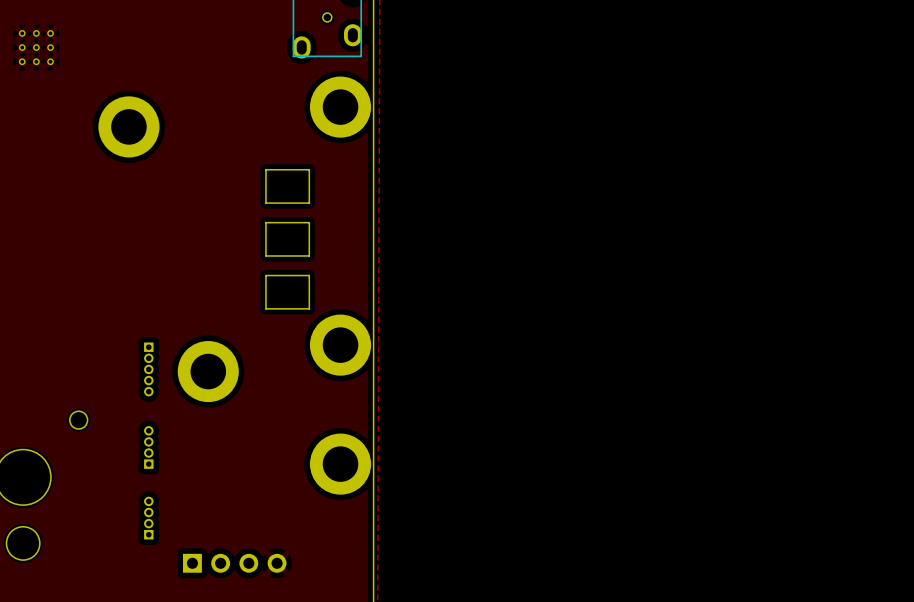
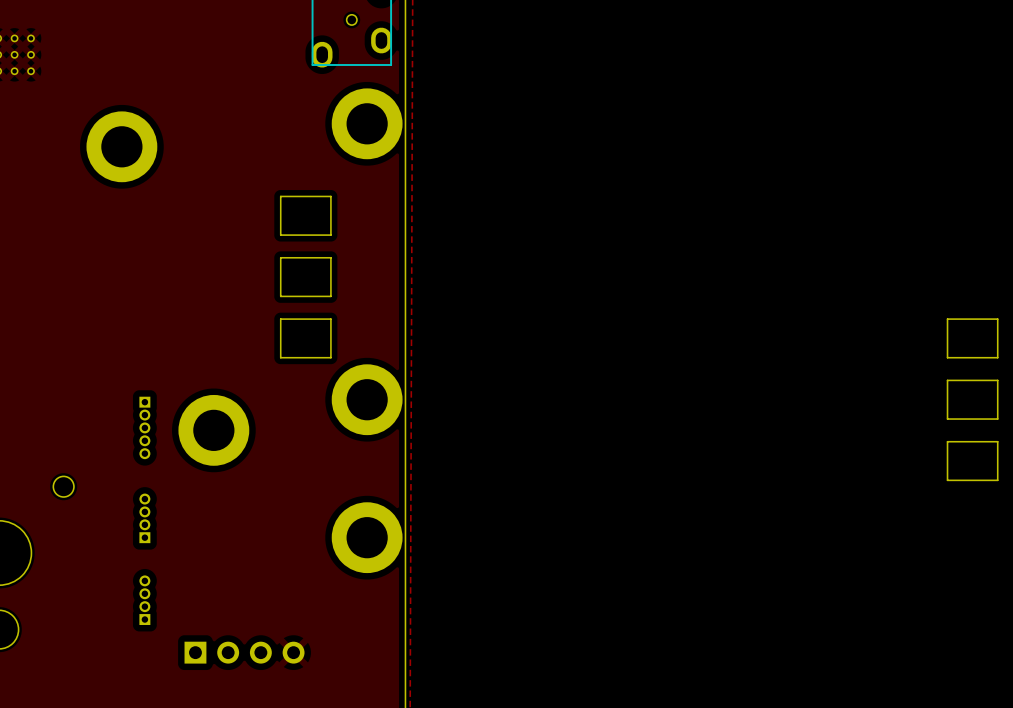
part: none -> (972, 338)
part: none -> (972, 399)
part: none -> (972, 461)

